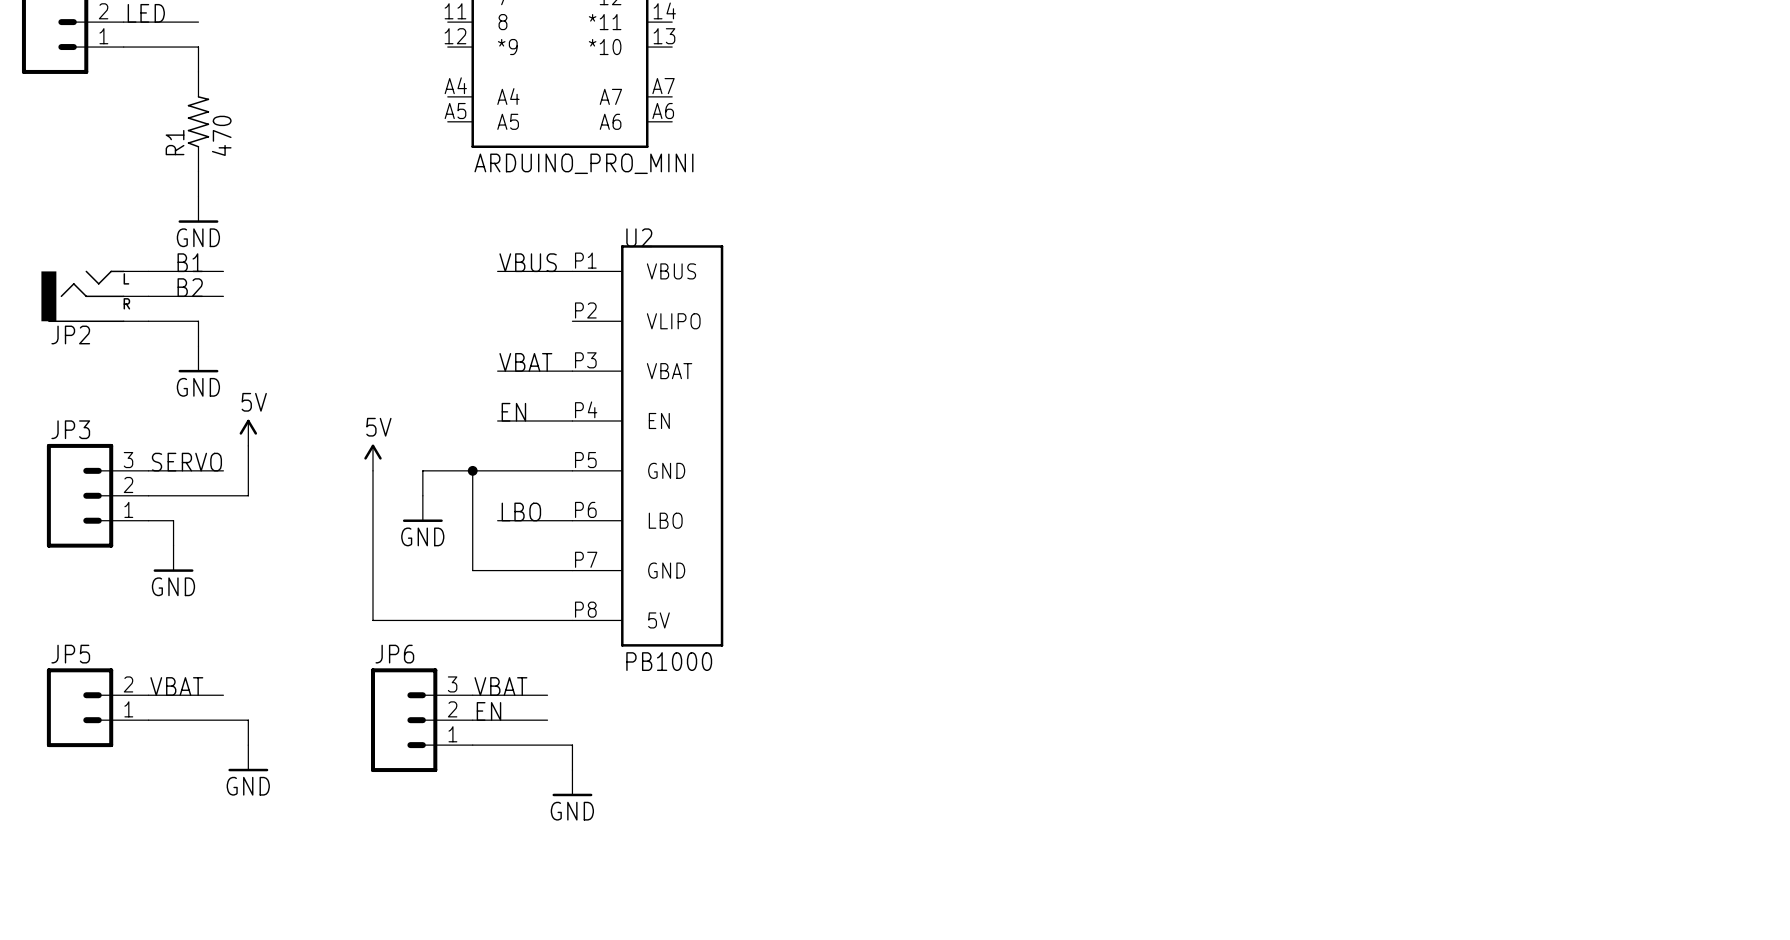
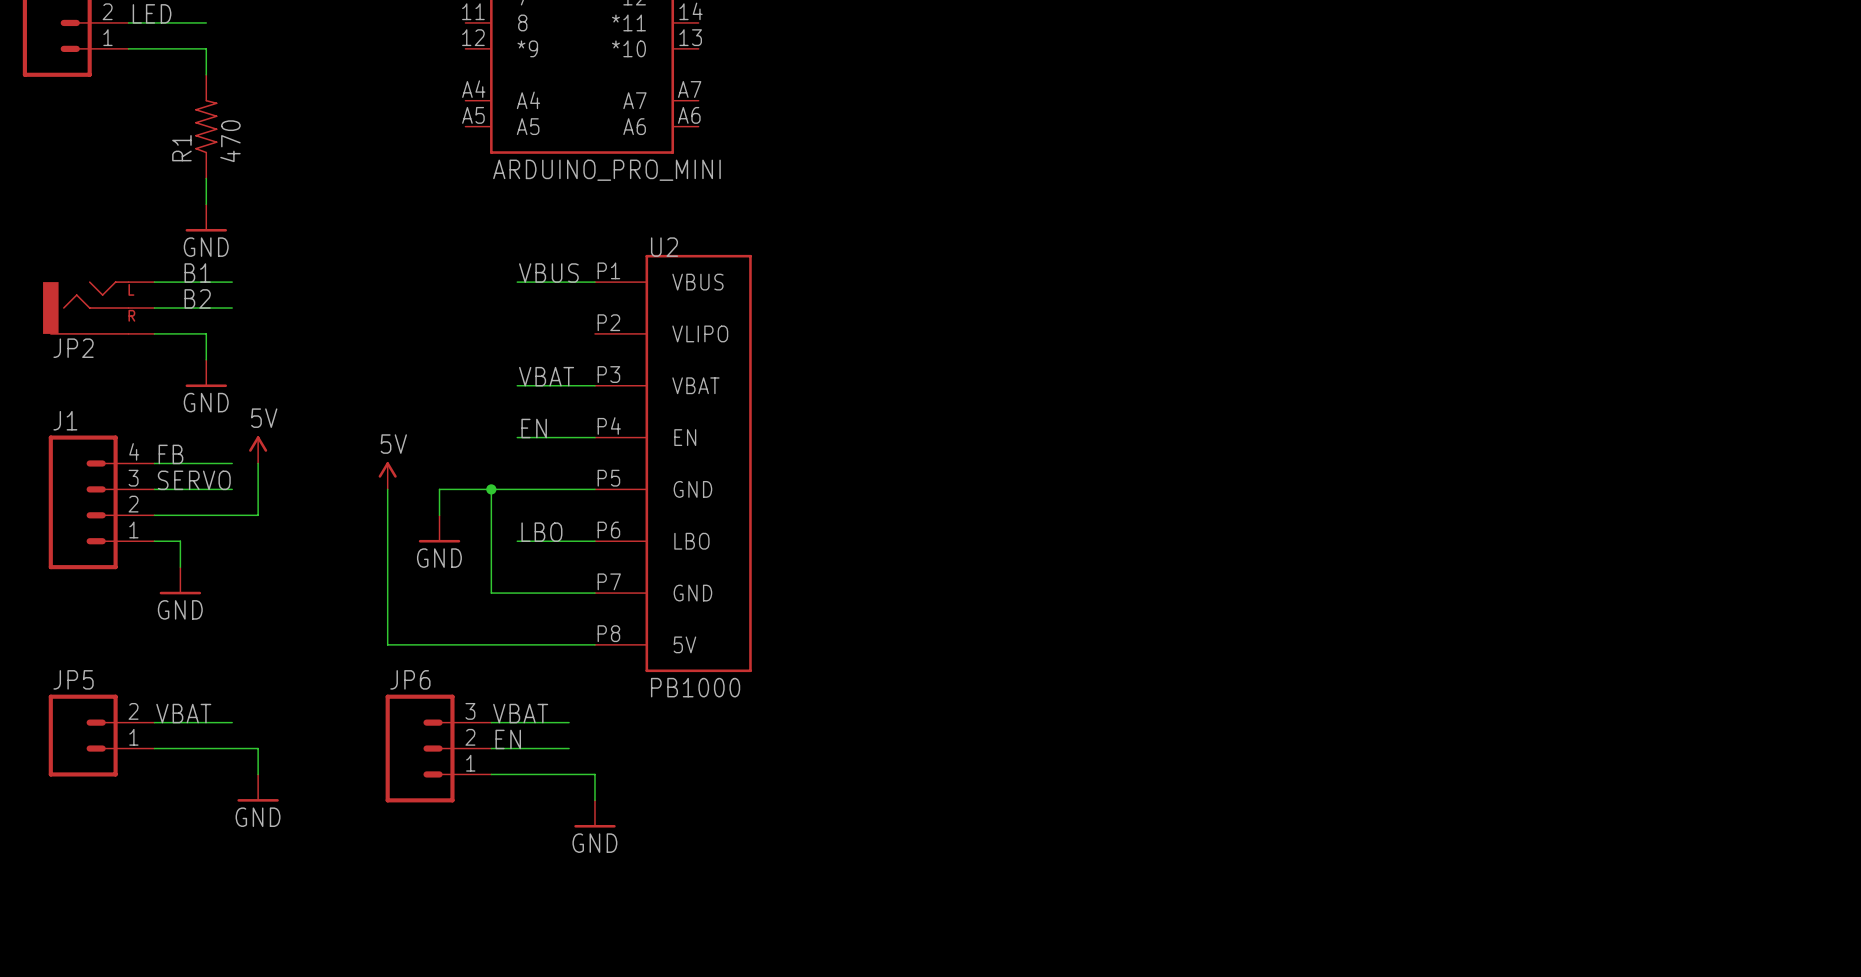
label: none -> FB (170, 454)
wire: none -> (154, 463) (232, 463)
J1: none -> (101, 502)
JP3: (97, 495) -> none

